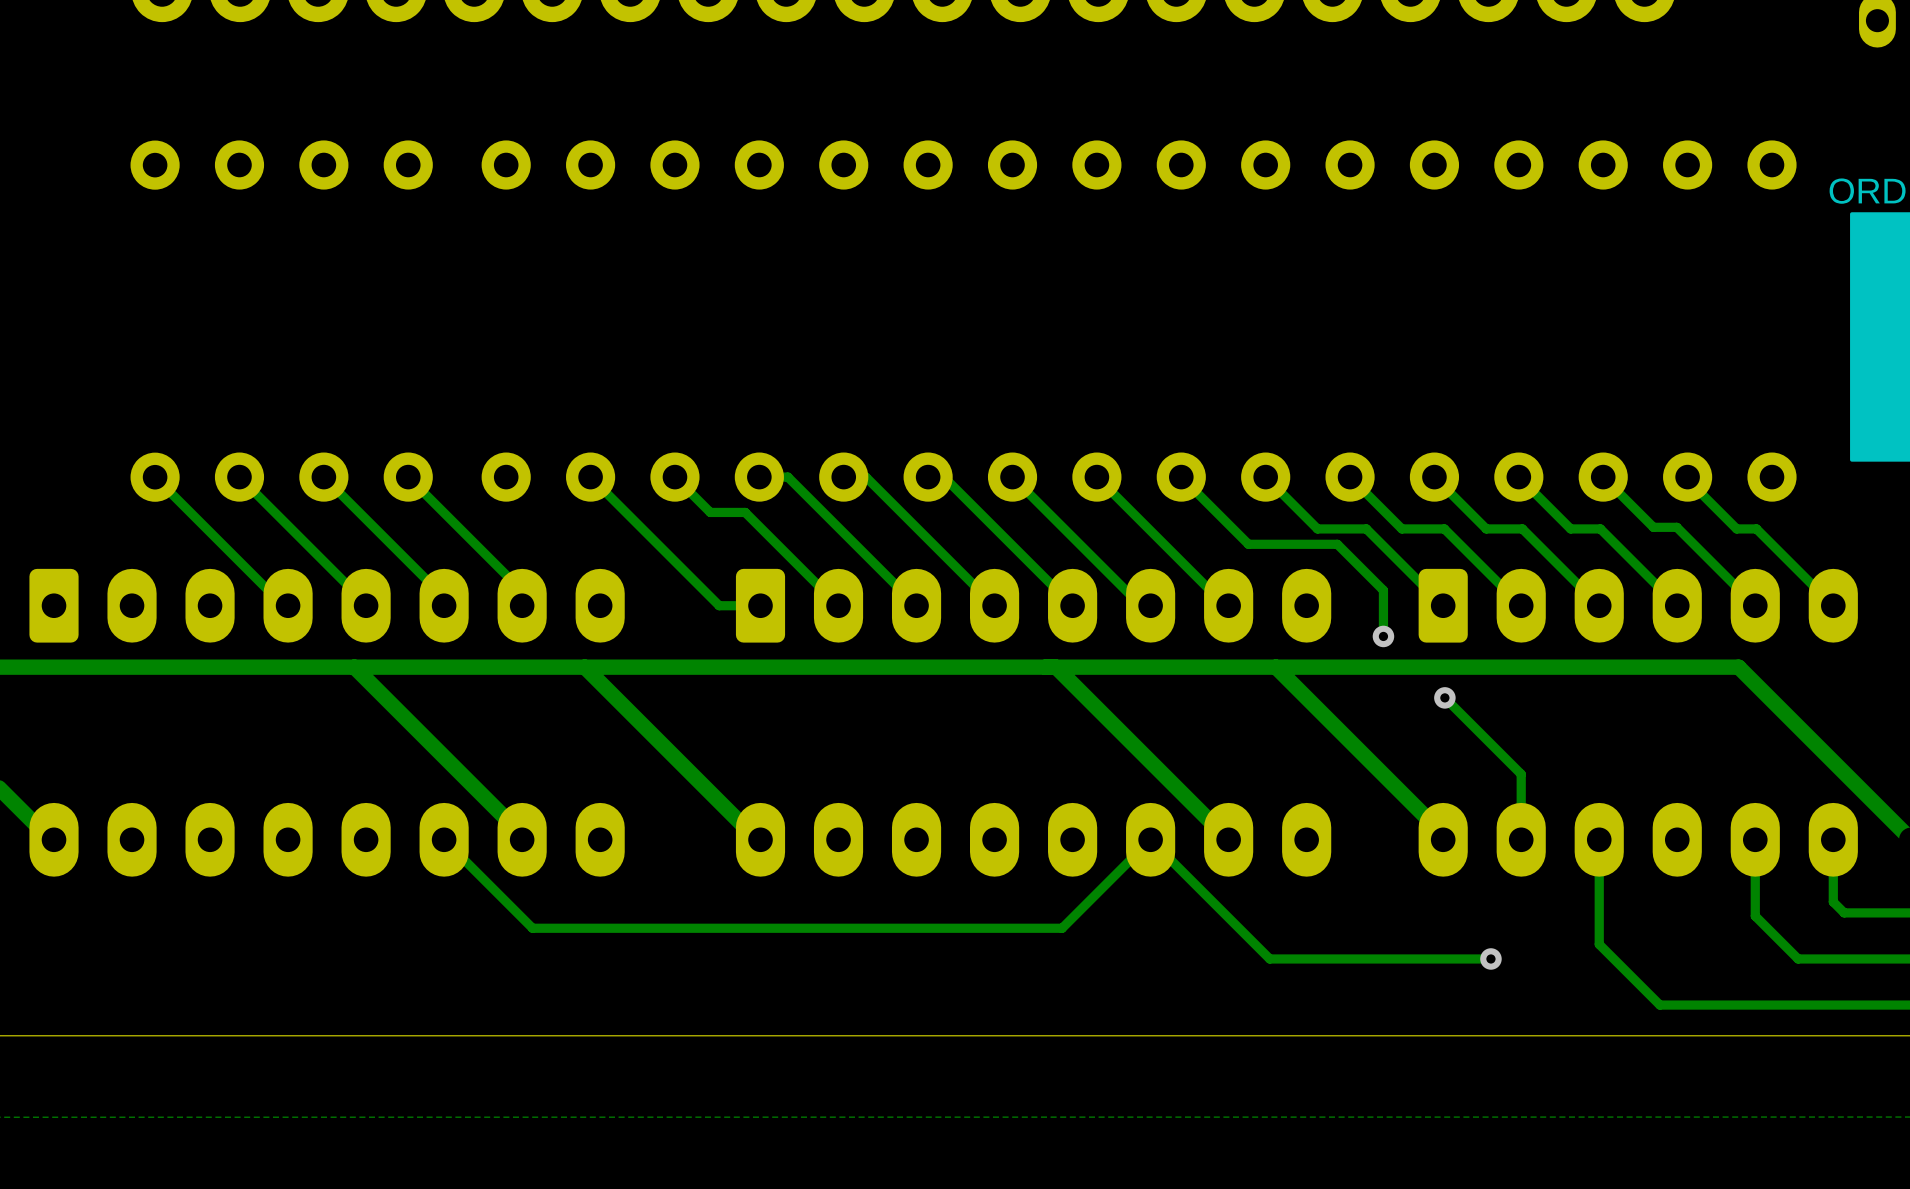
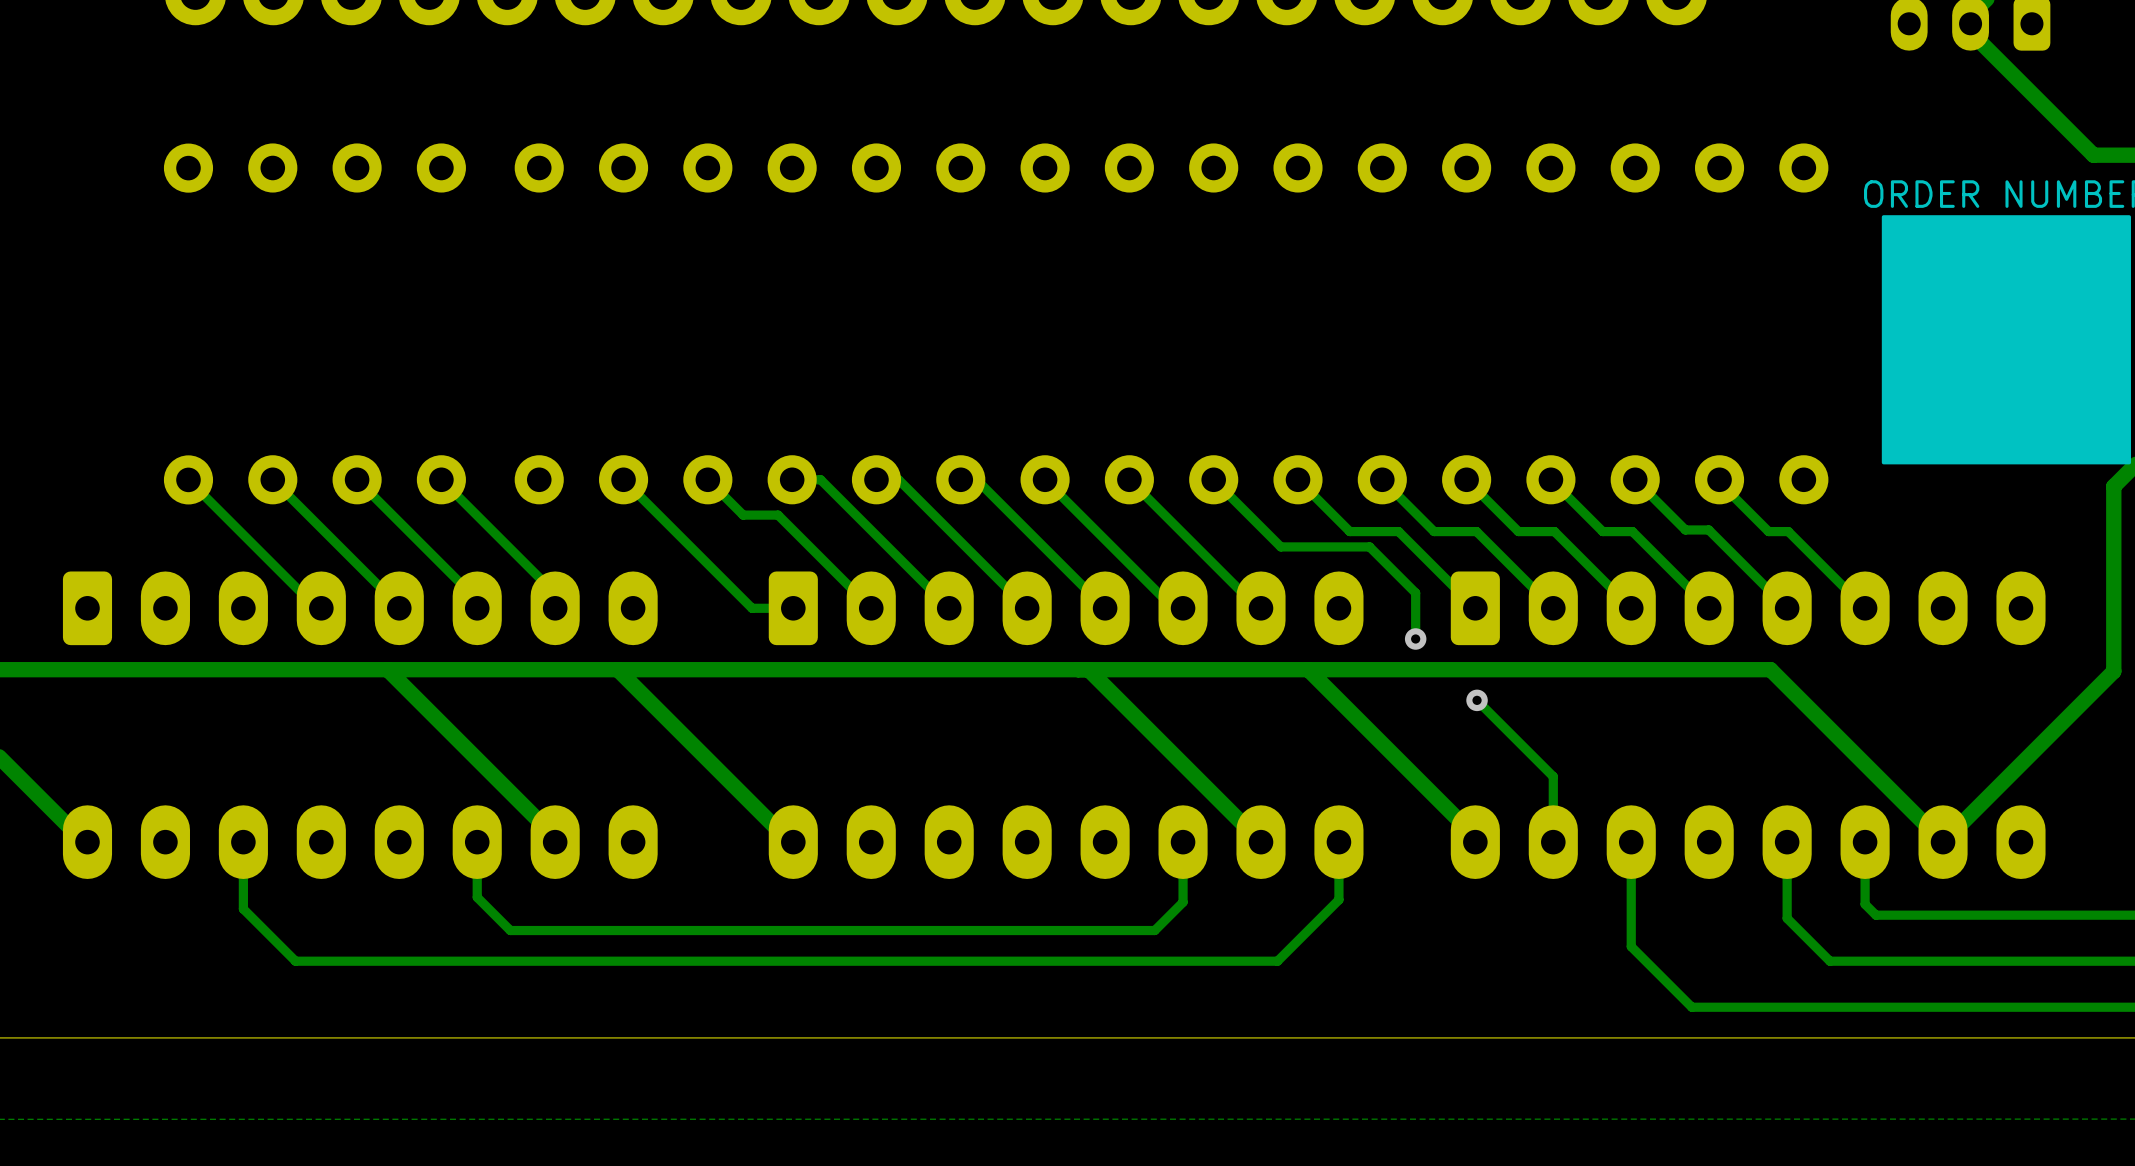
track: (444, 839) (532, 928) -> (477, 842) (477, 897) (510, 930) (565, 930)
track: none -> (1338, 842) (1338, 899) (1277, 961) (295, 961) (243, 909) (243, 842)
track: (1062, 928) (1150, 839) (1269, 958) (1490, 958) -> (1094, 930) (1154, 930) (1183, 902) (1183, 842)
via: (1490, 958) -> none

